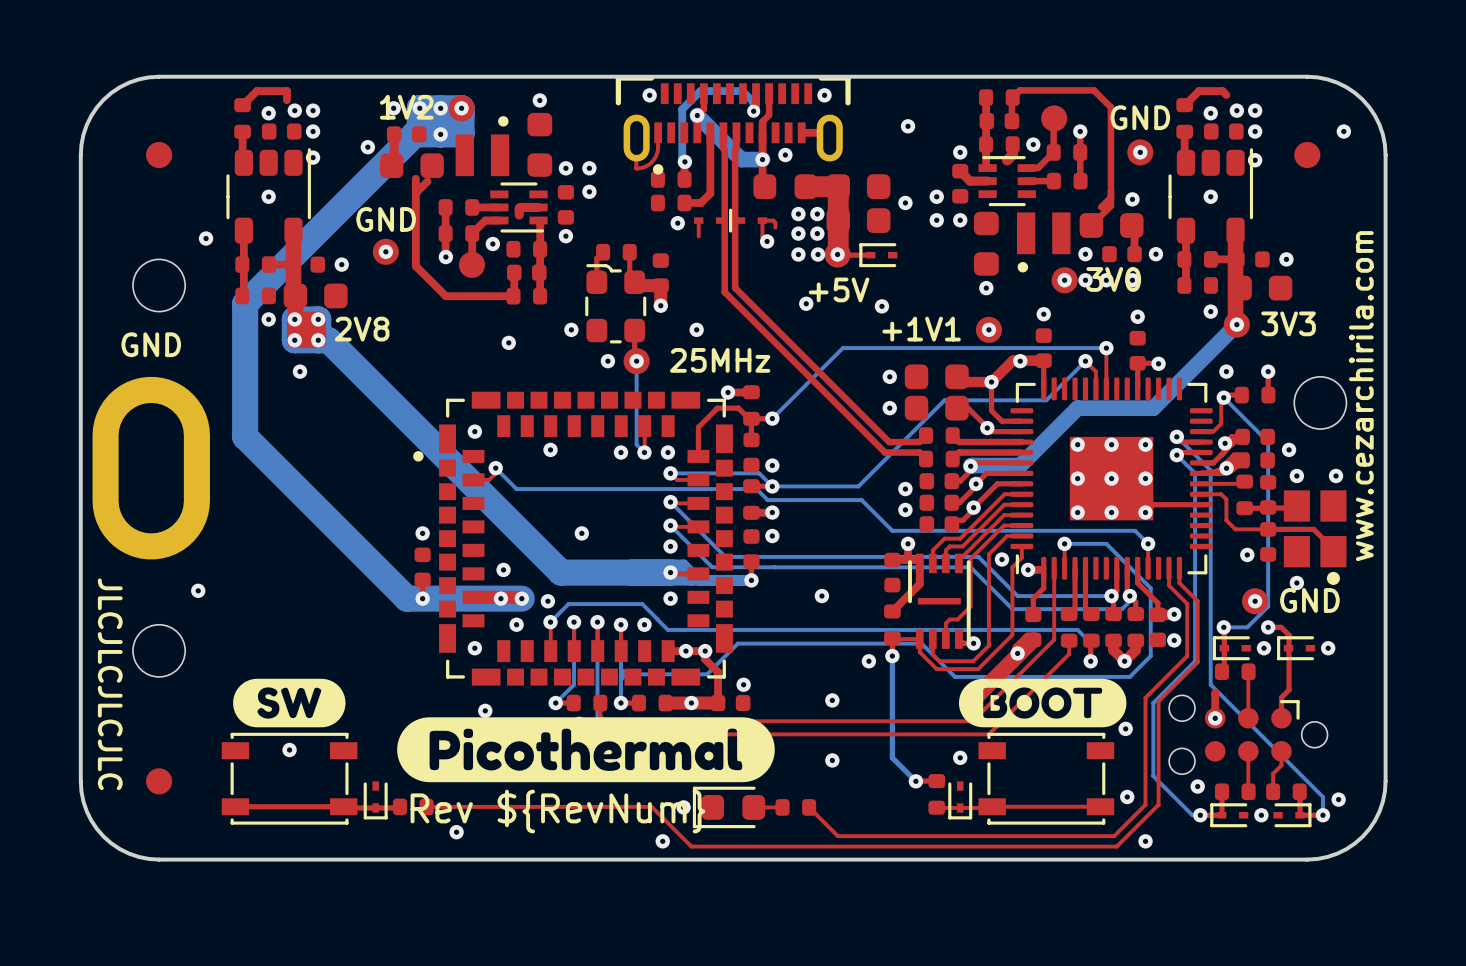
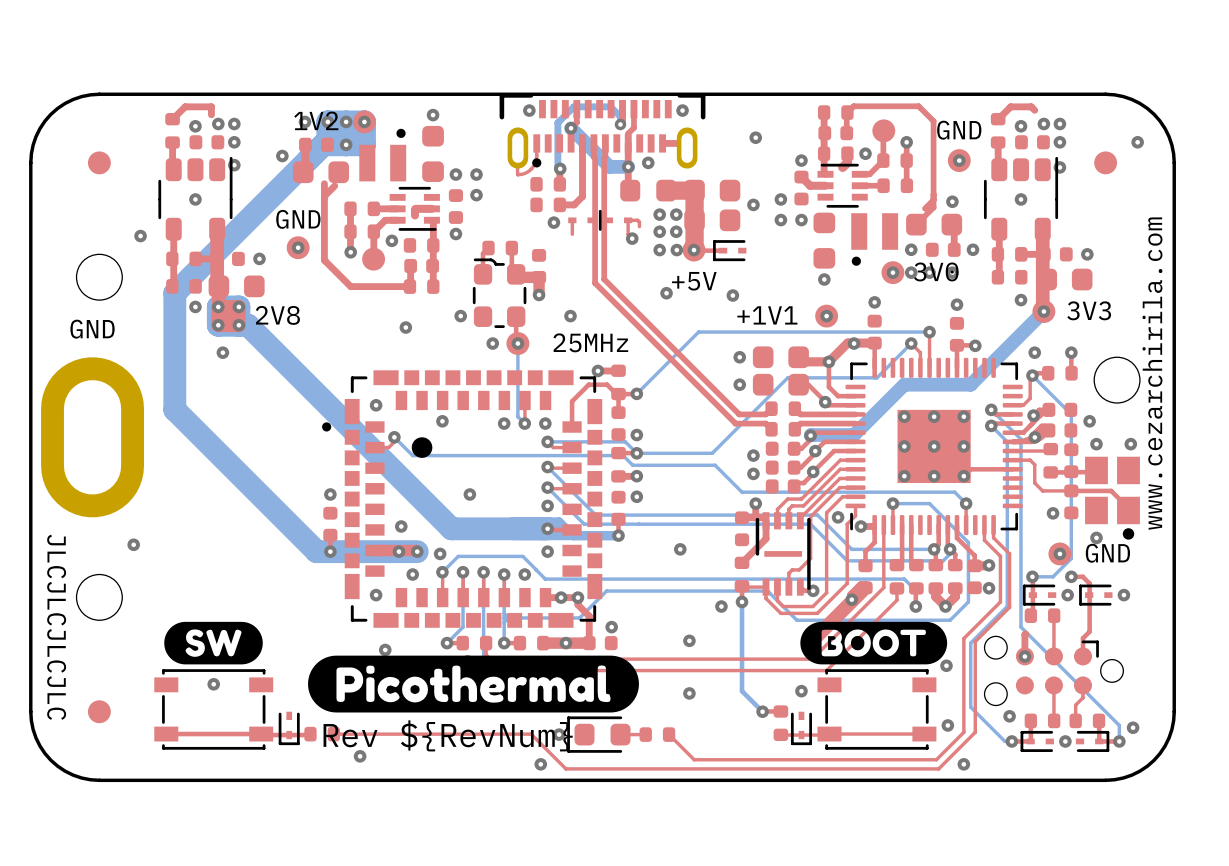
part footprint: [615, 75, 851, 175] -> [499, 93, 706, 169]
part footprint: [413, 391, 733, 686] -> [322, 370, 603, 628]

